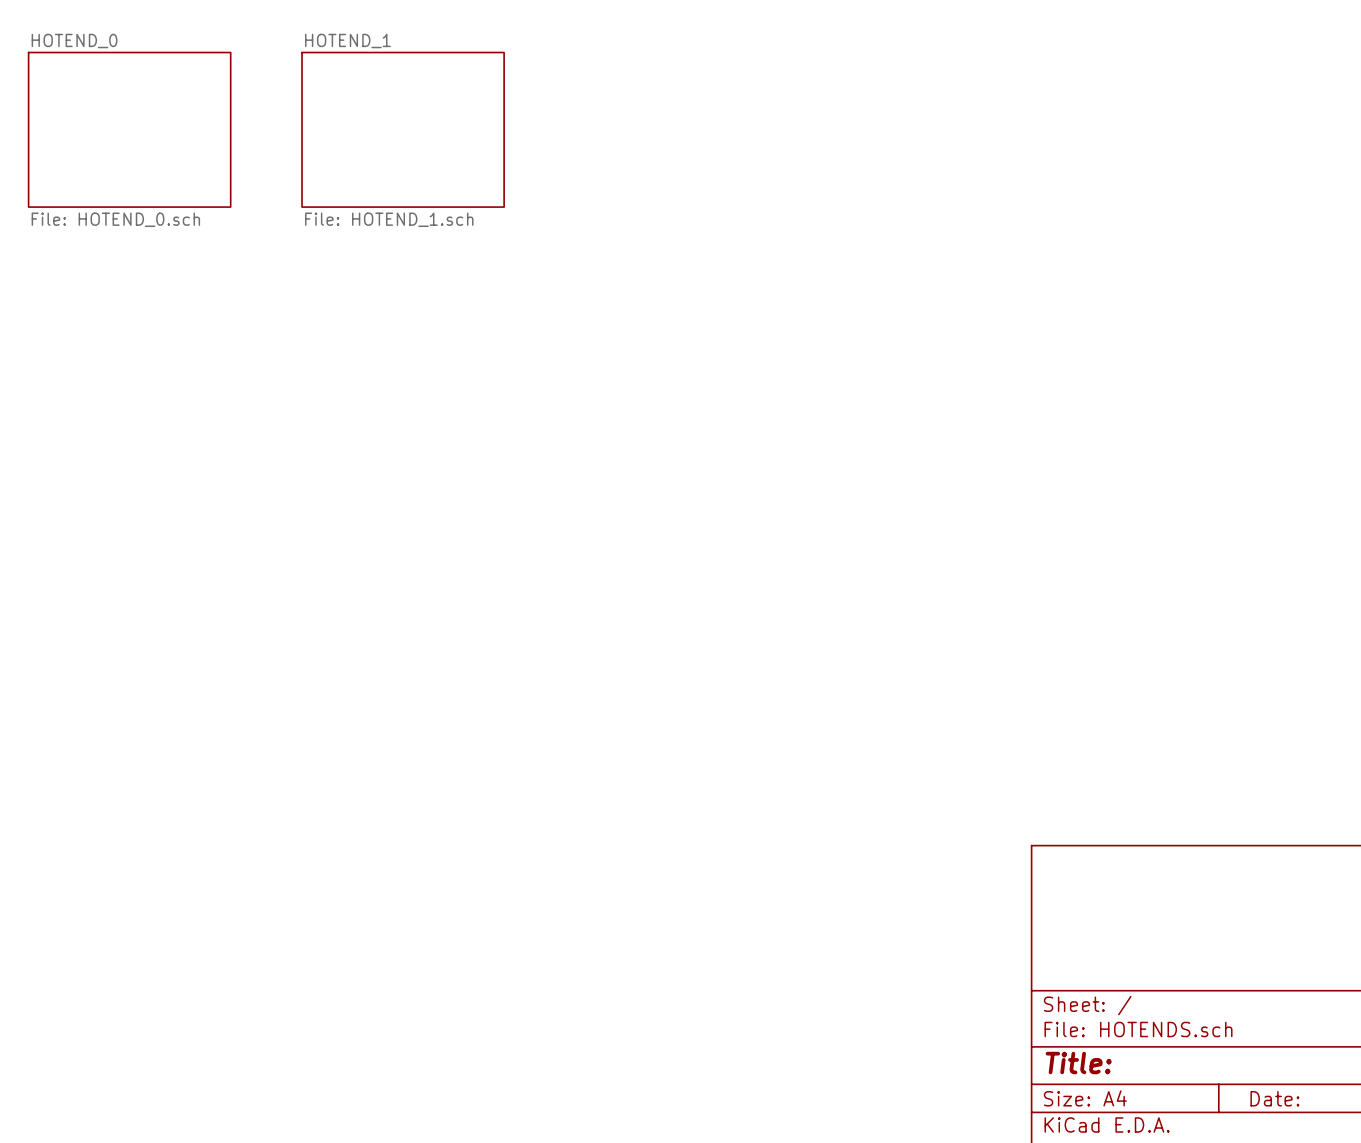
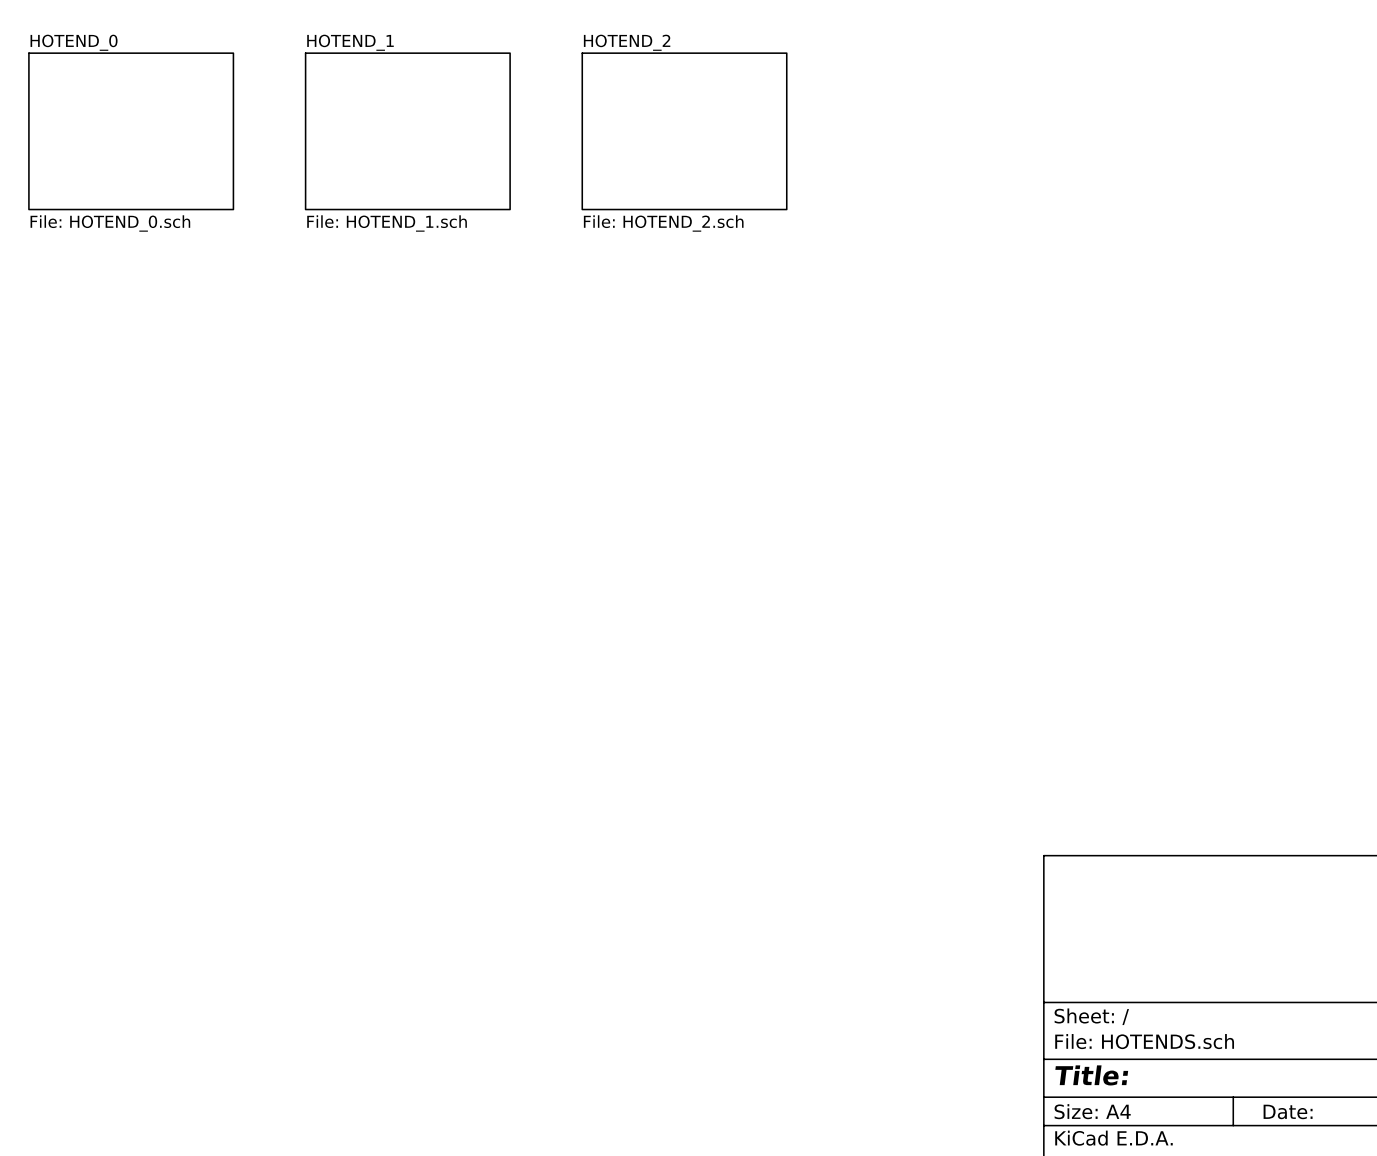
sheet HOTEND_2: none -> File: HOTEND_2.sch (684, 131)

